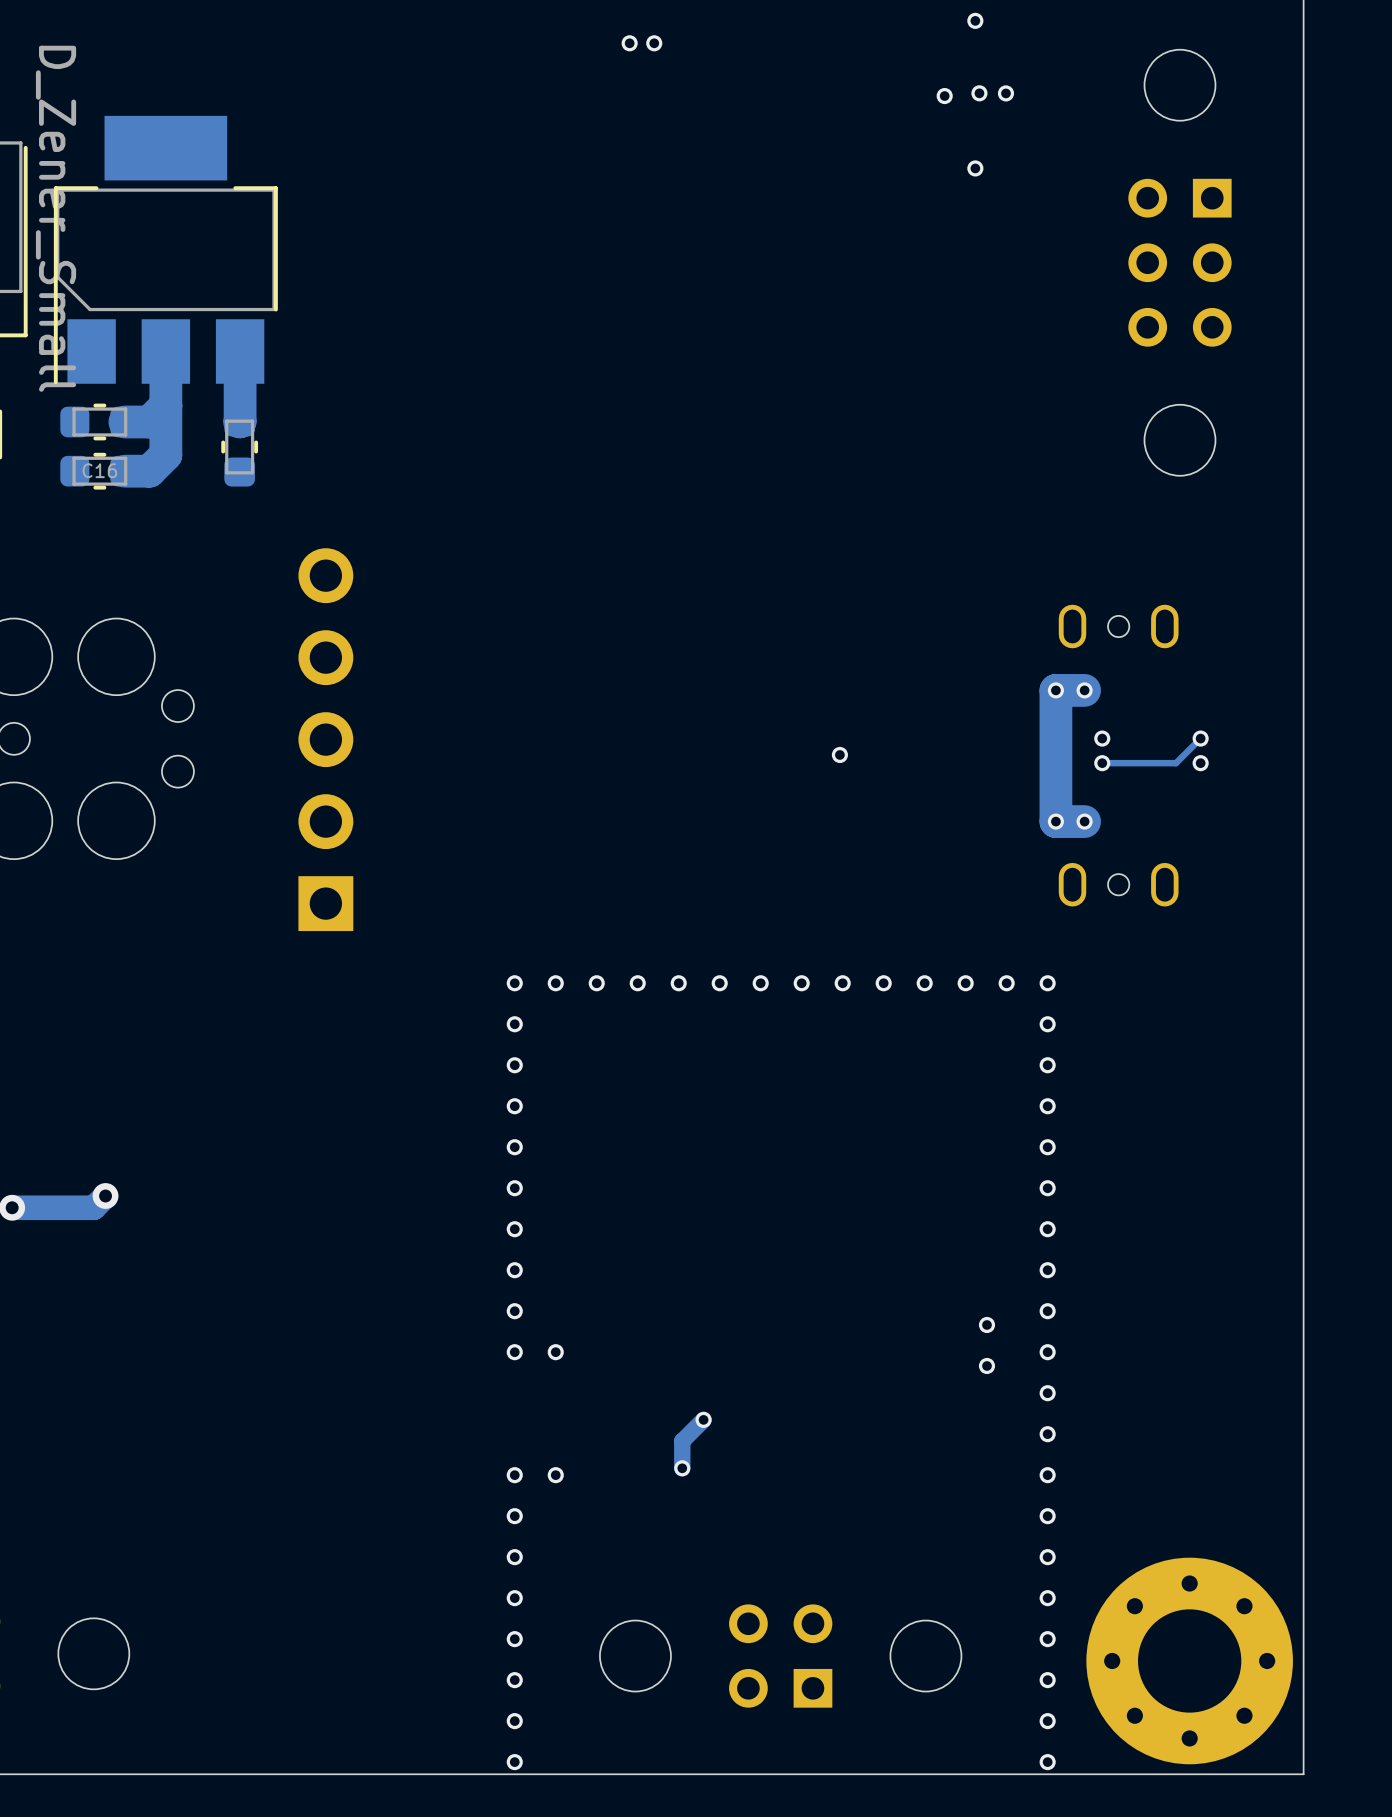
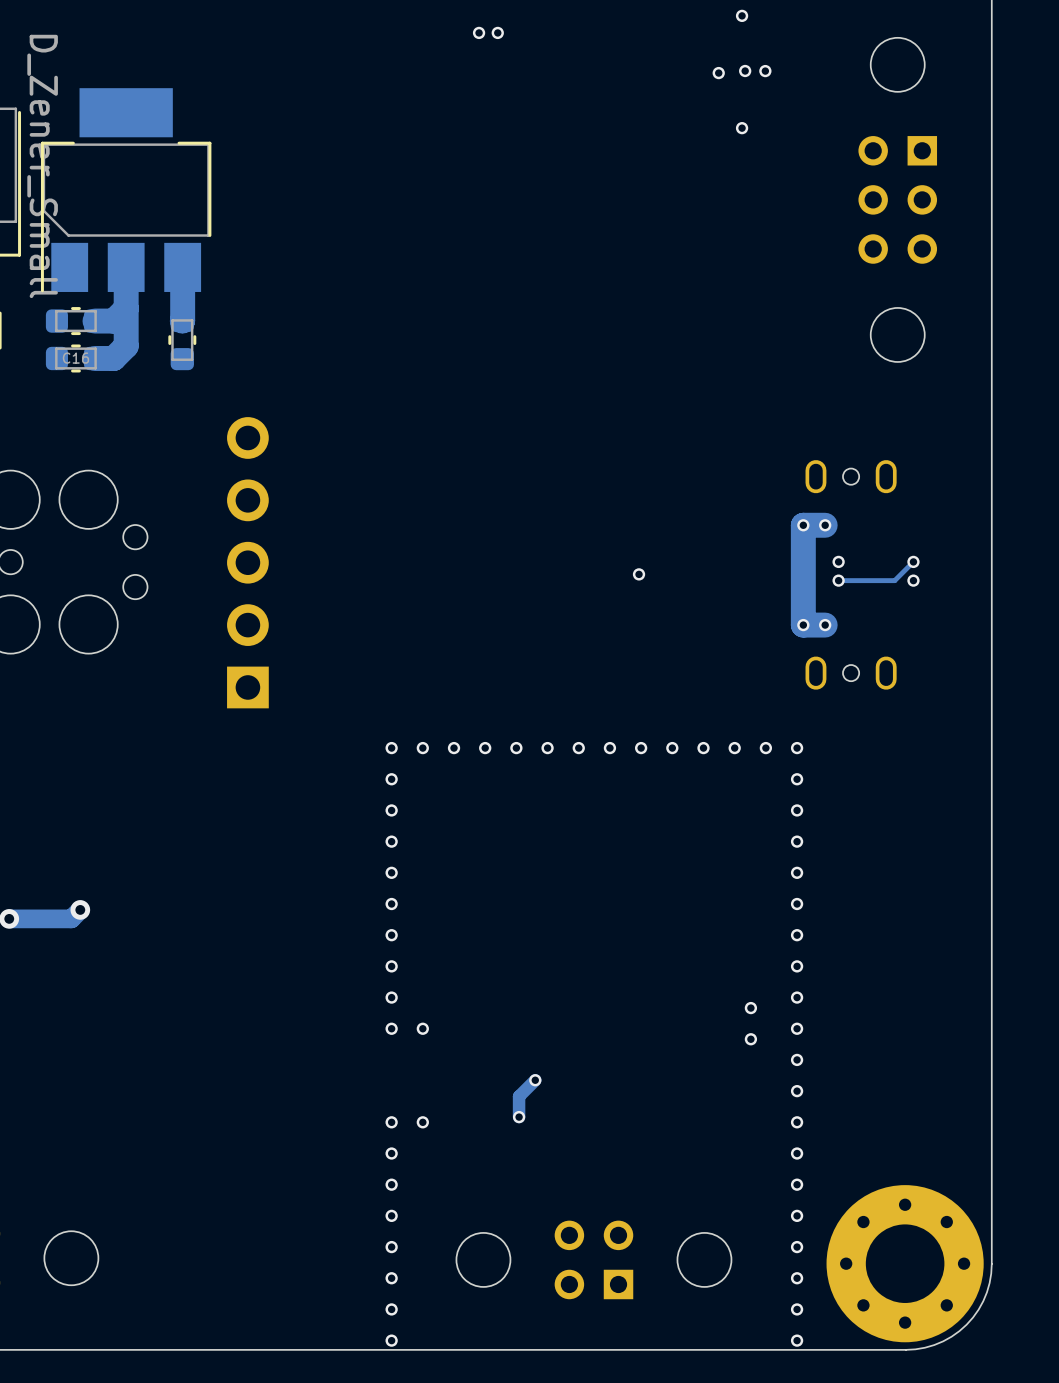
board edge: (1303, 1661) (1303, 1774) (1190, 1774) -> (991, 1263) (986, 1292) (978, 1309) (966, 1324) (951, 1336) (934, 1345) (905, 1349)

